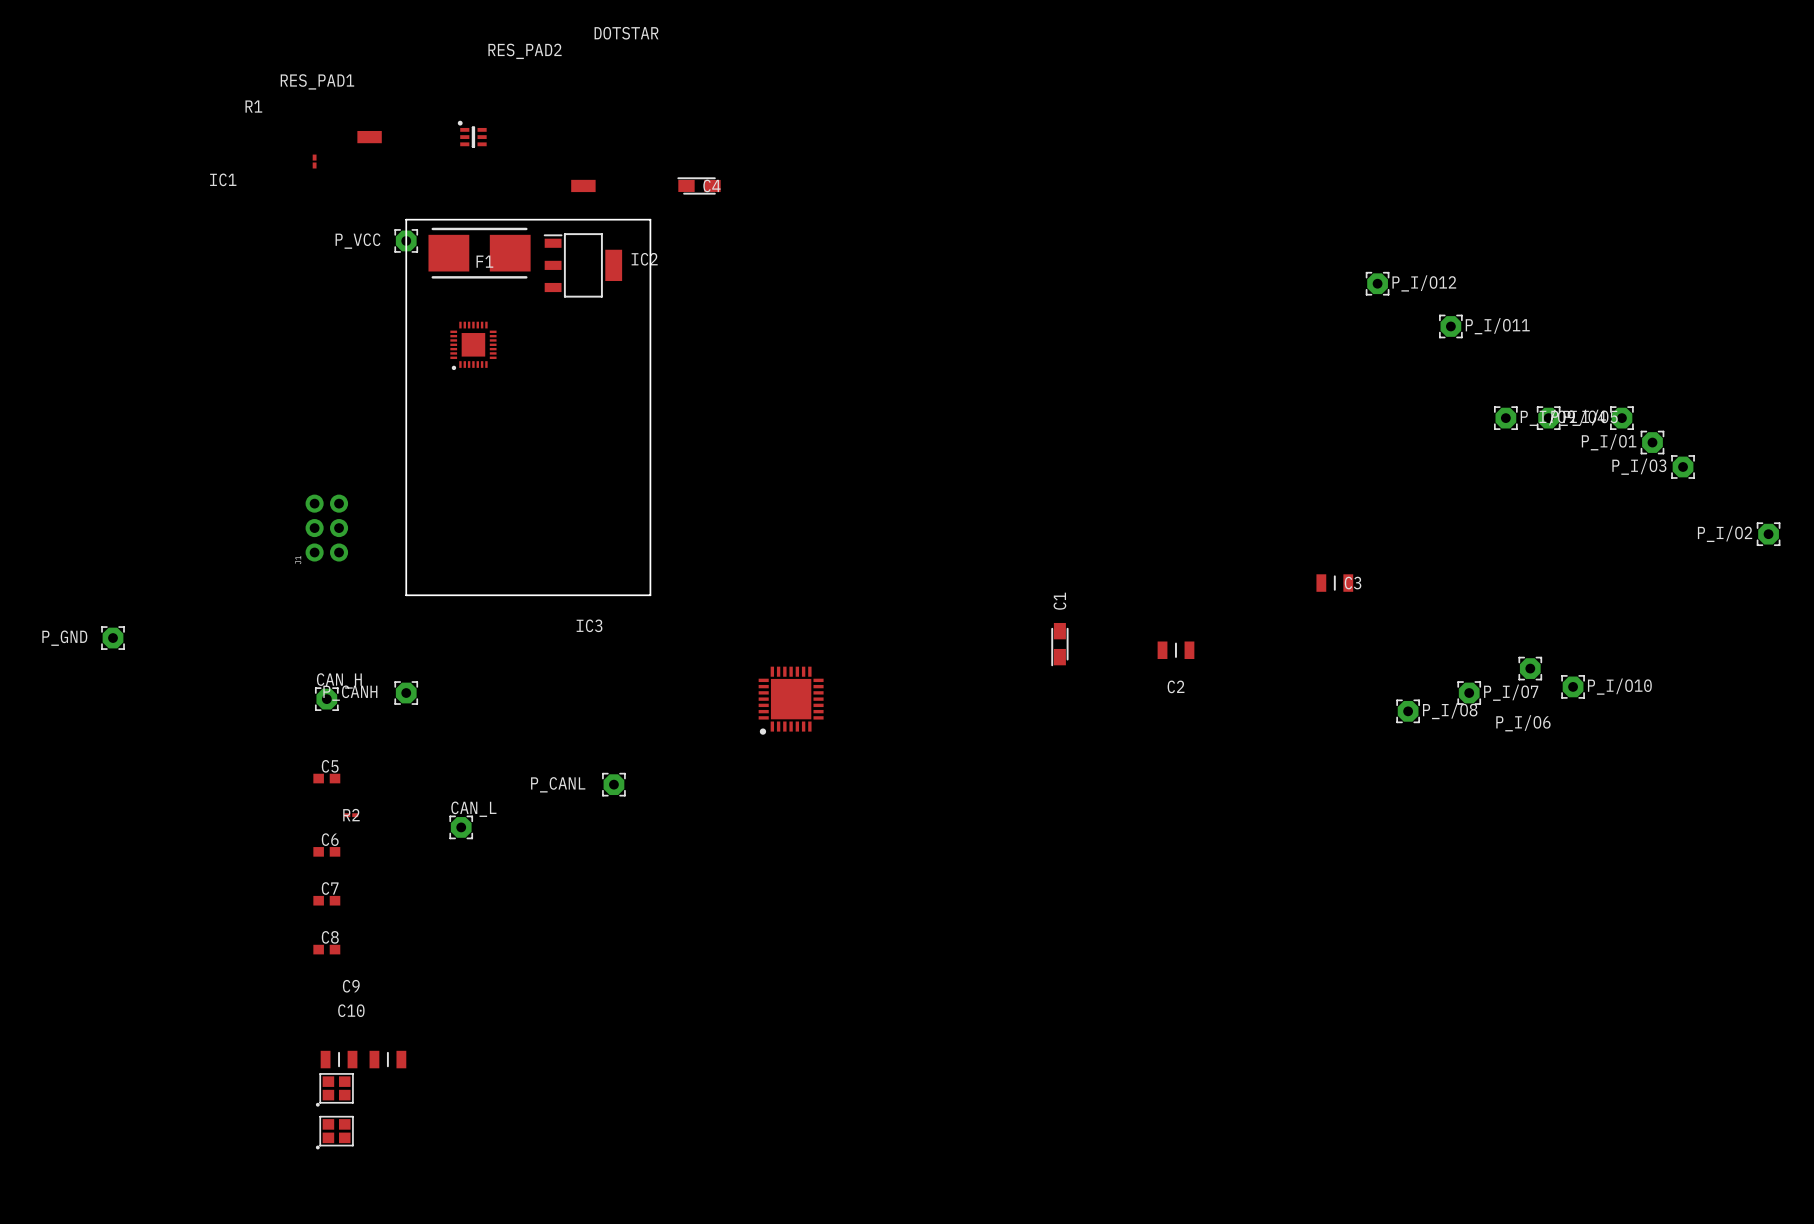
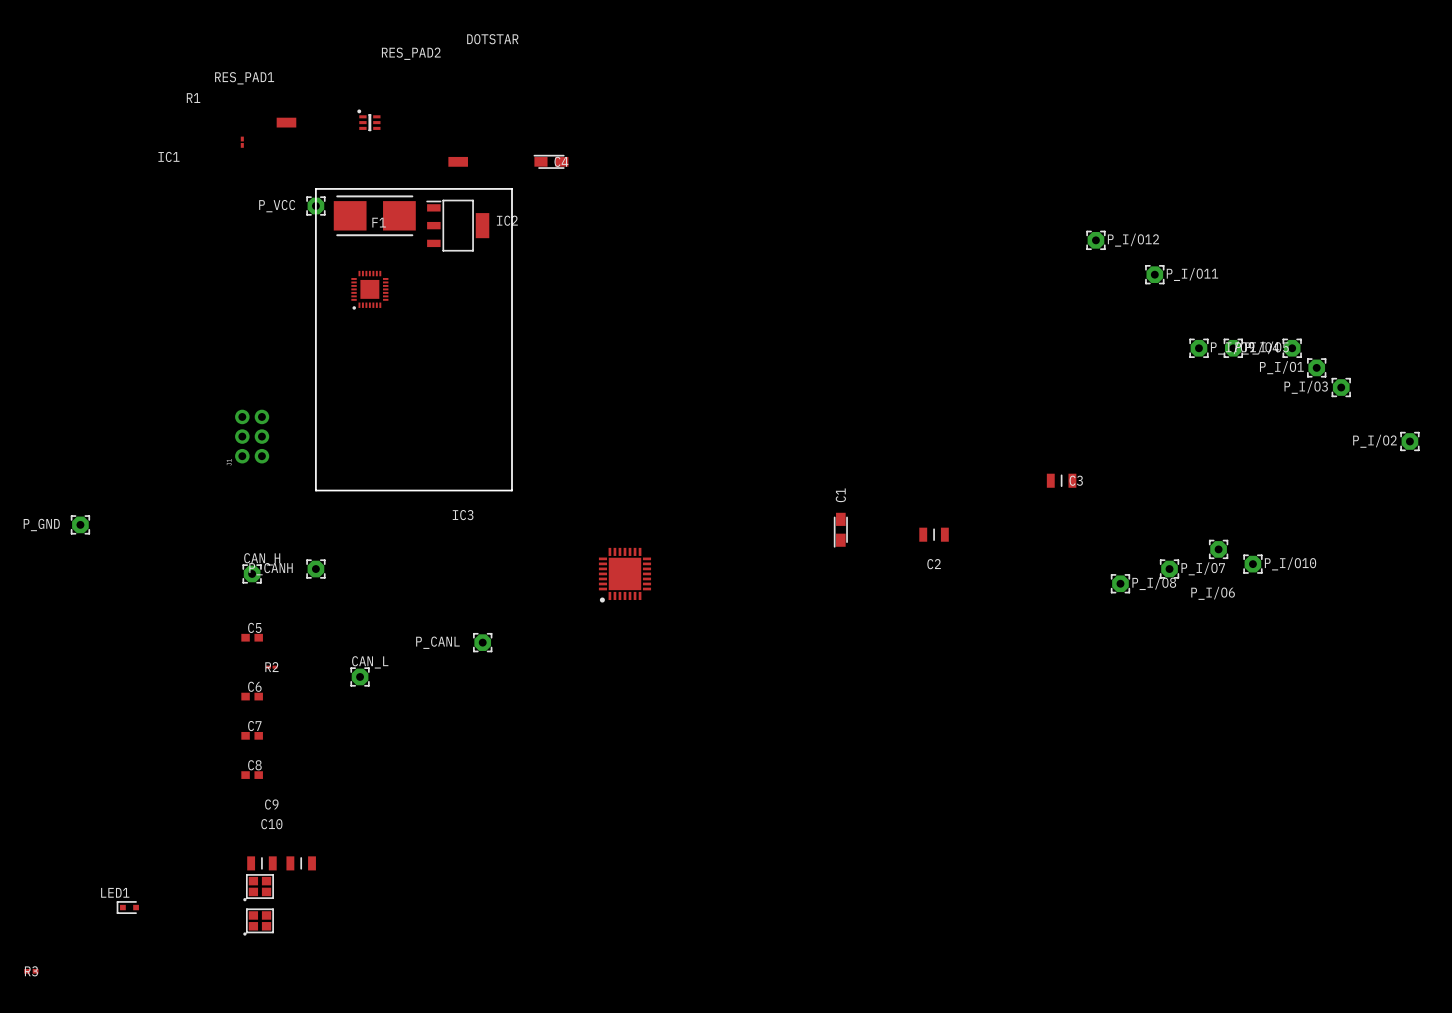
LED1: none -> (127, 907)
R3: none -> (31, 971)

